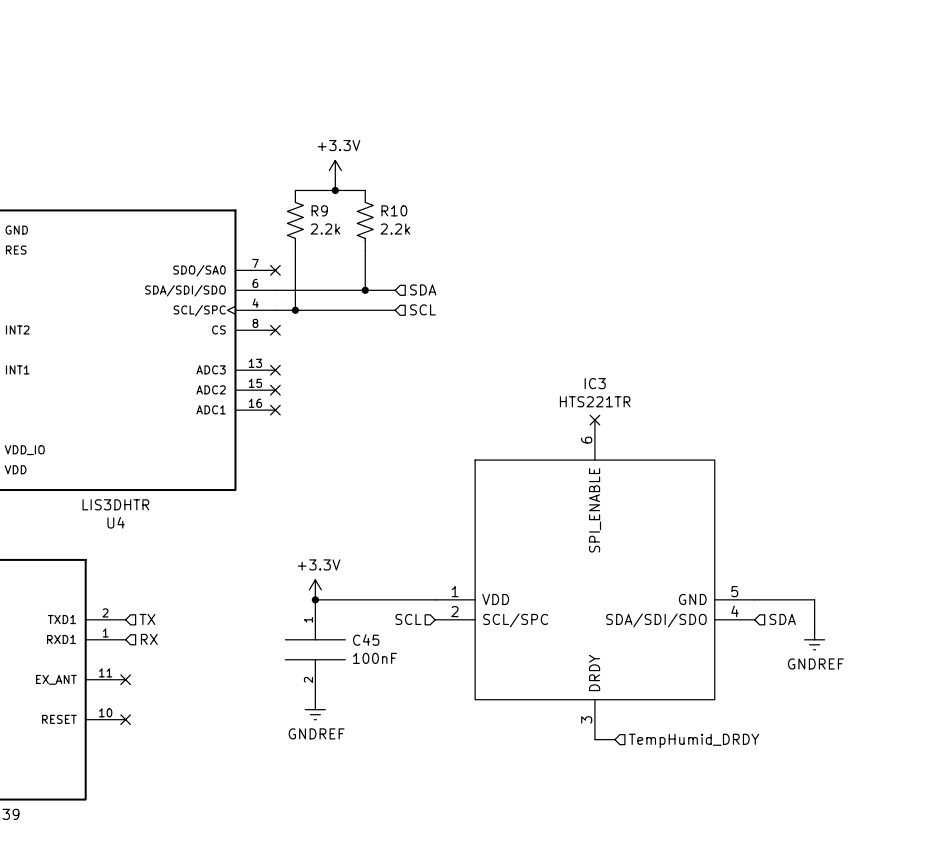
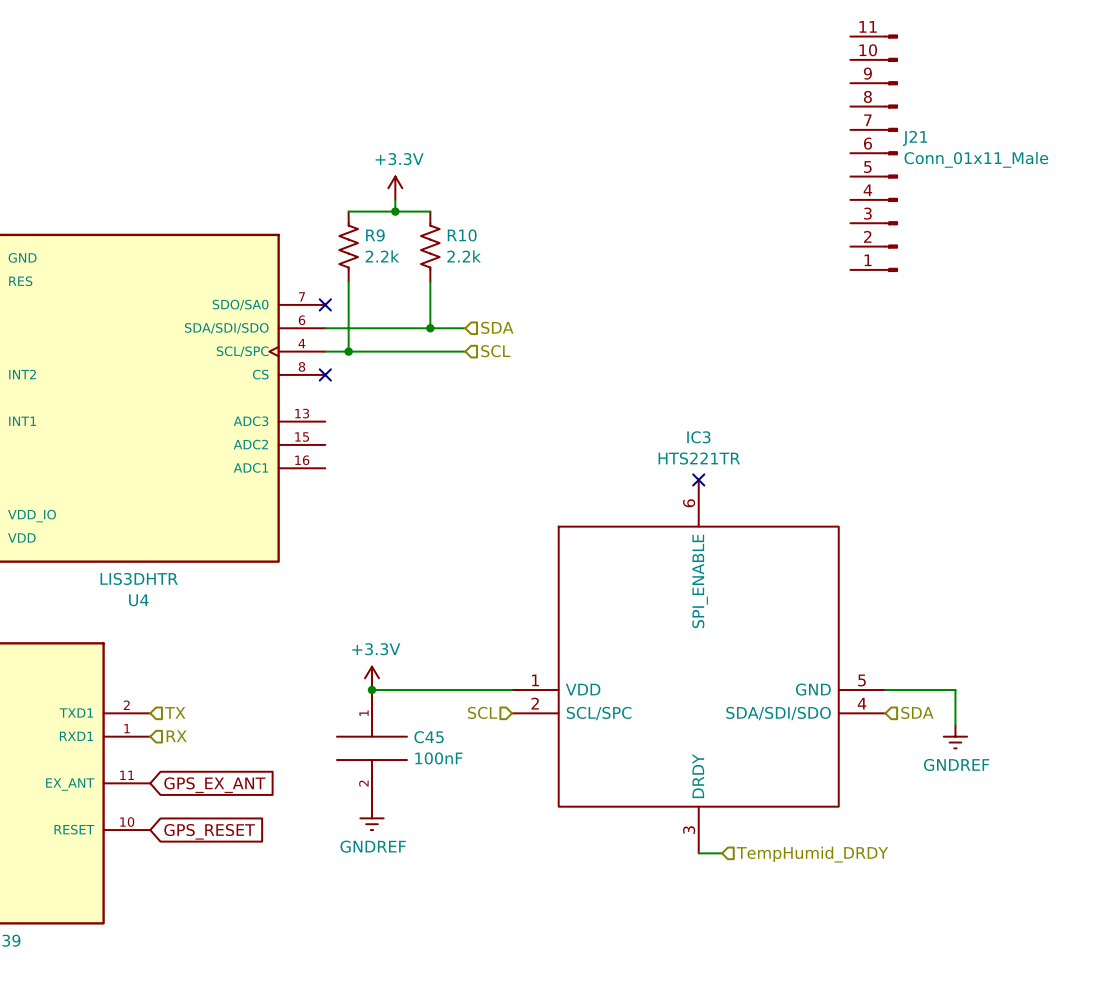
J21: none -> Conn_01x11_Male (874, 153)
no-connect mark: (275, 370) -> none
no-connect mark: (275, 390) -> none
no-connect mark: (275, 410) -> none
no-connect mark: (125, 679) -> none
global label: none -> GPS_EX_ANT (214, 785)
no-connect mark: (125, 719) -> none
global label: none -> GPS_RESET (209, 831)

